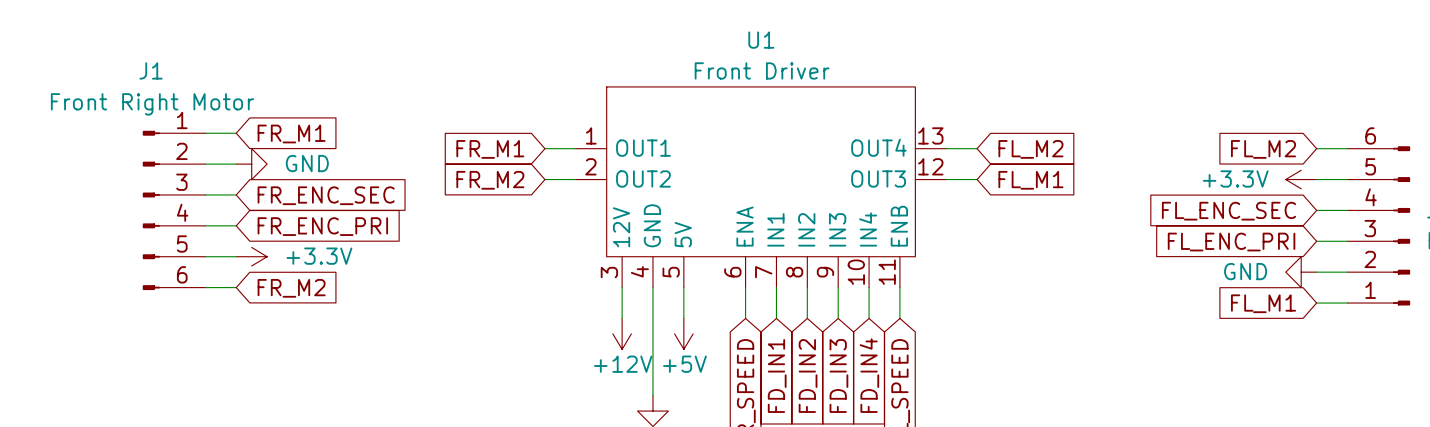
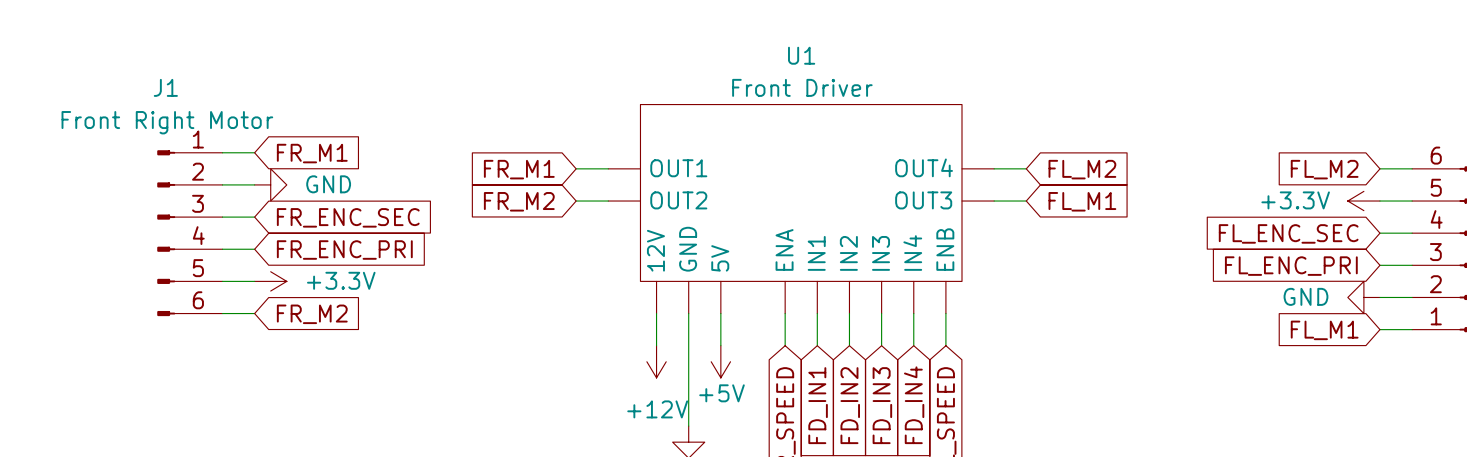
U1 symbol: [575, 86, 947, 288] -> [608, 104, 995, 314]
power symbol text position: +12V (623, 364) -> +12V (657, 409)

